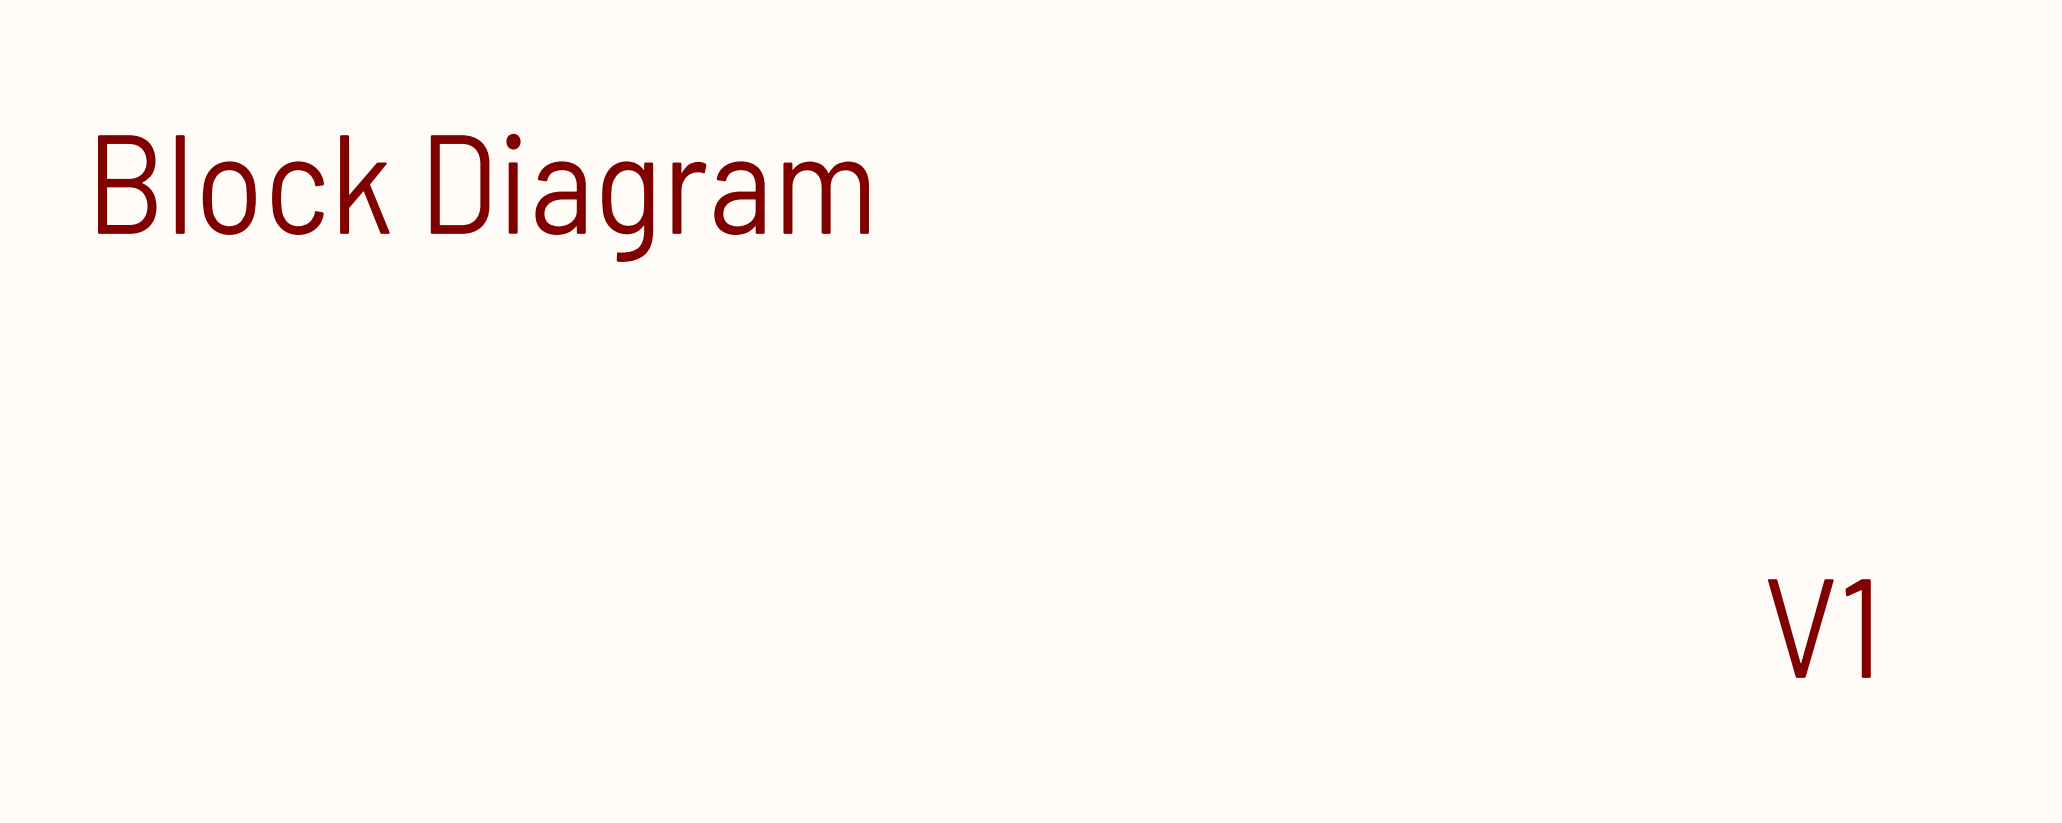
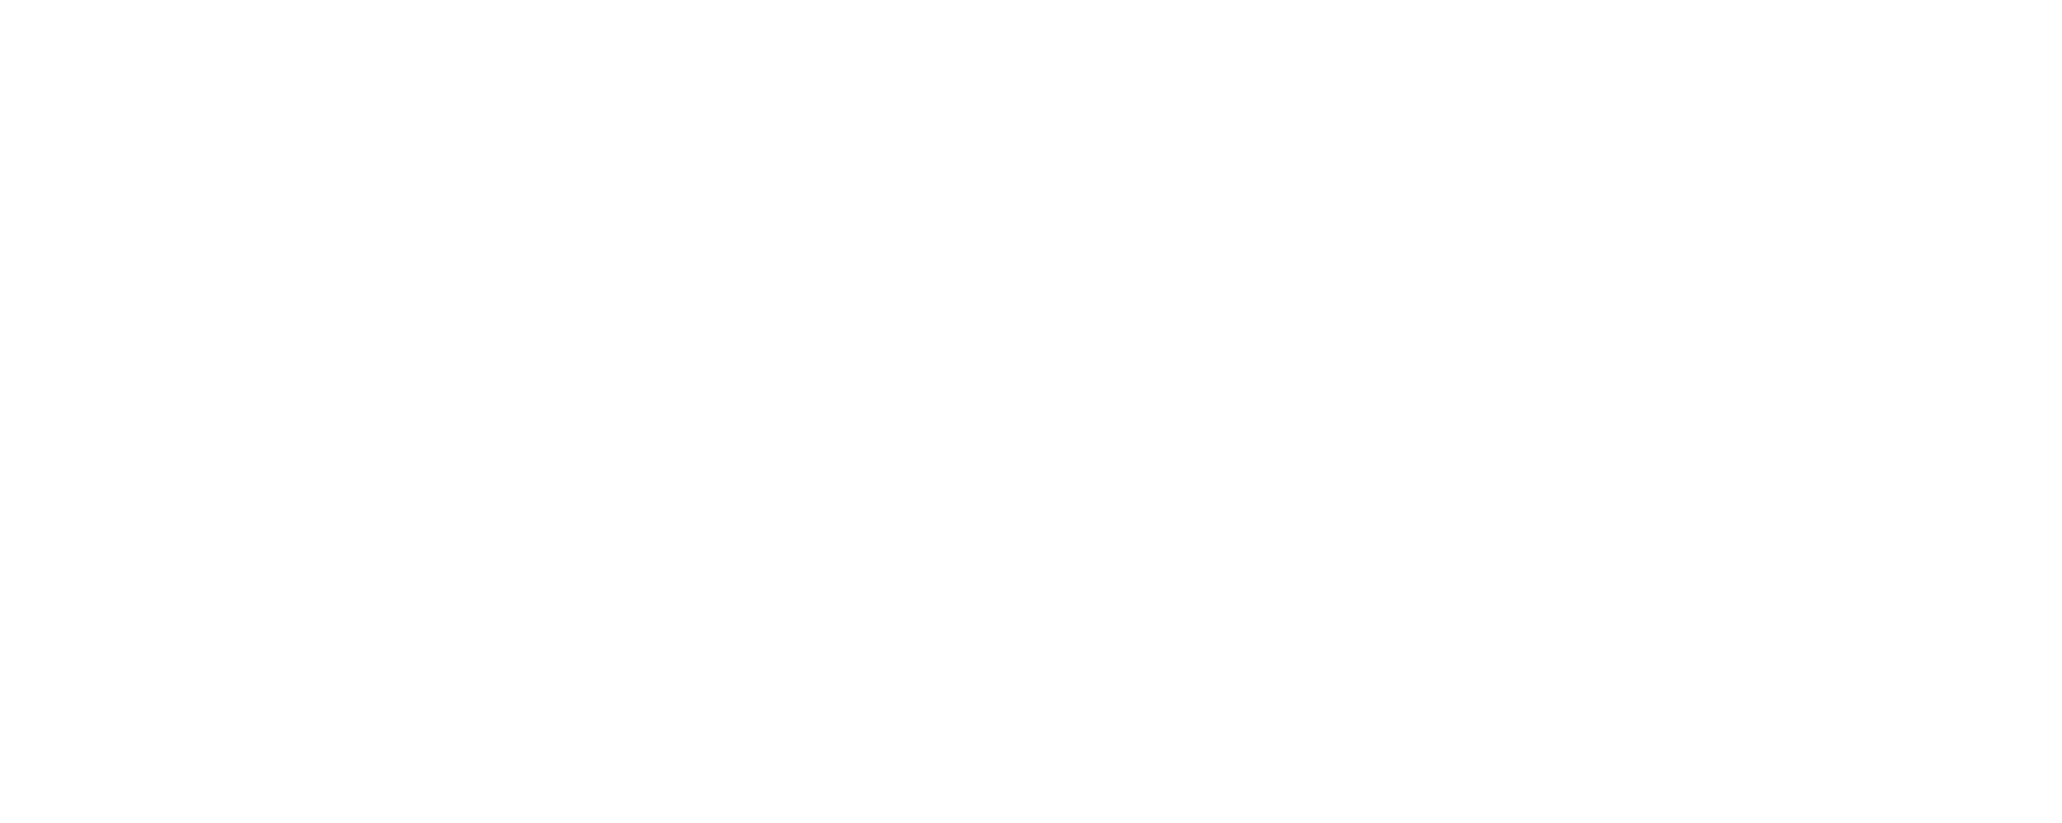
text: Block Diagram (483, 197) -> none
text: V1 (1819, 628) -> none

